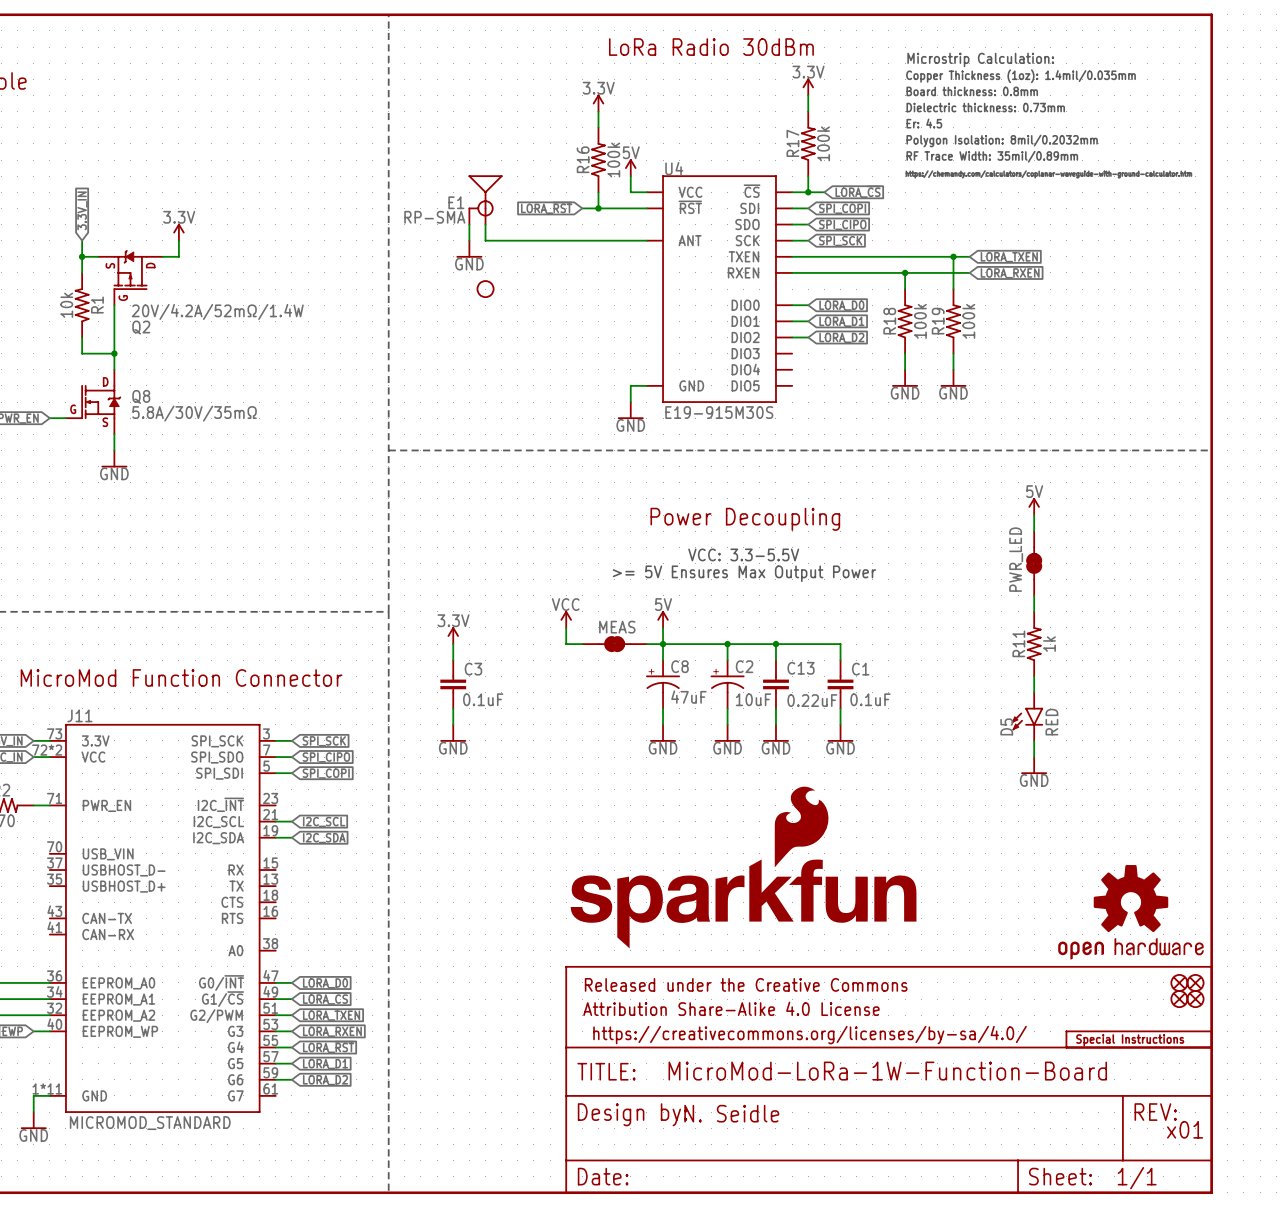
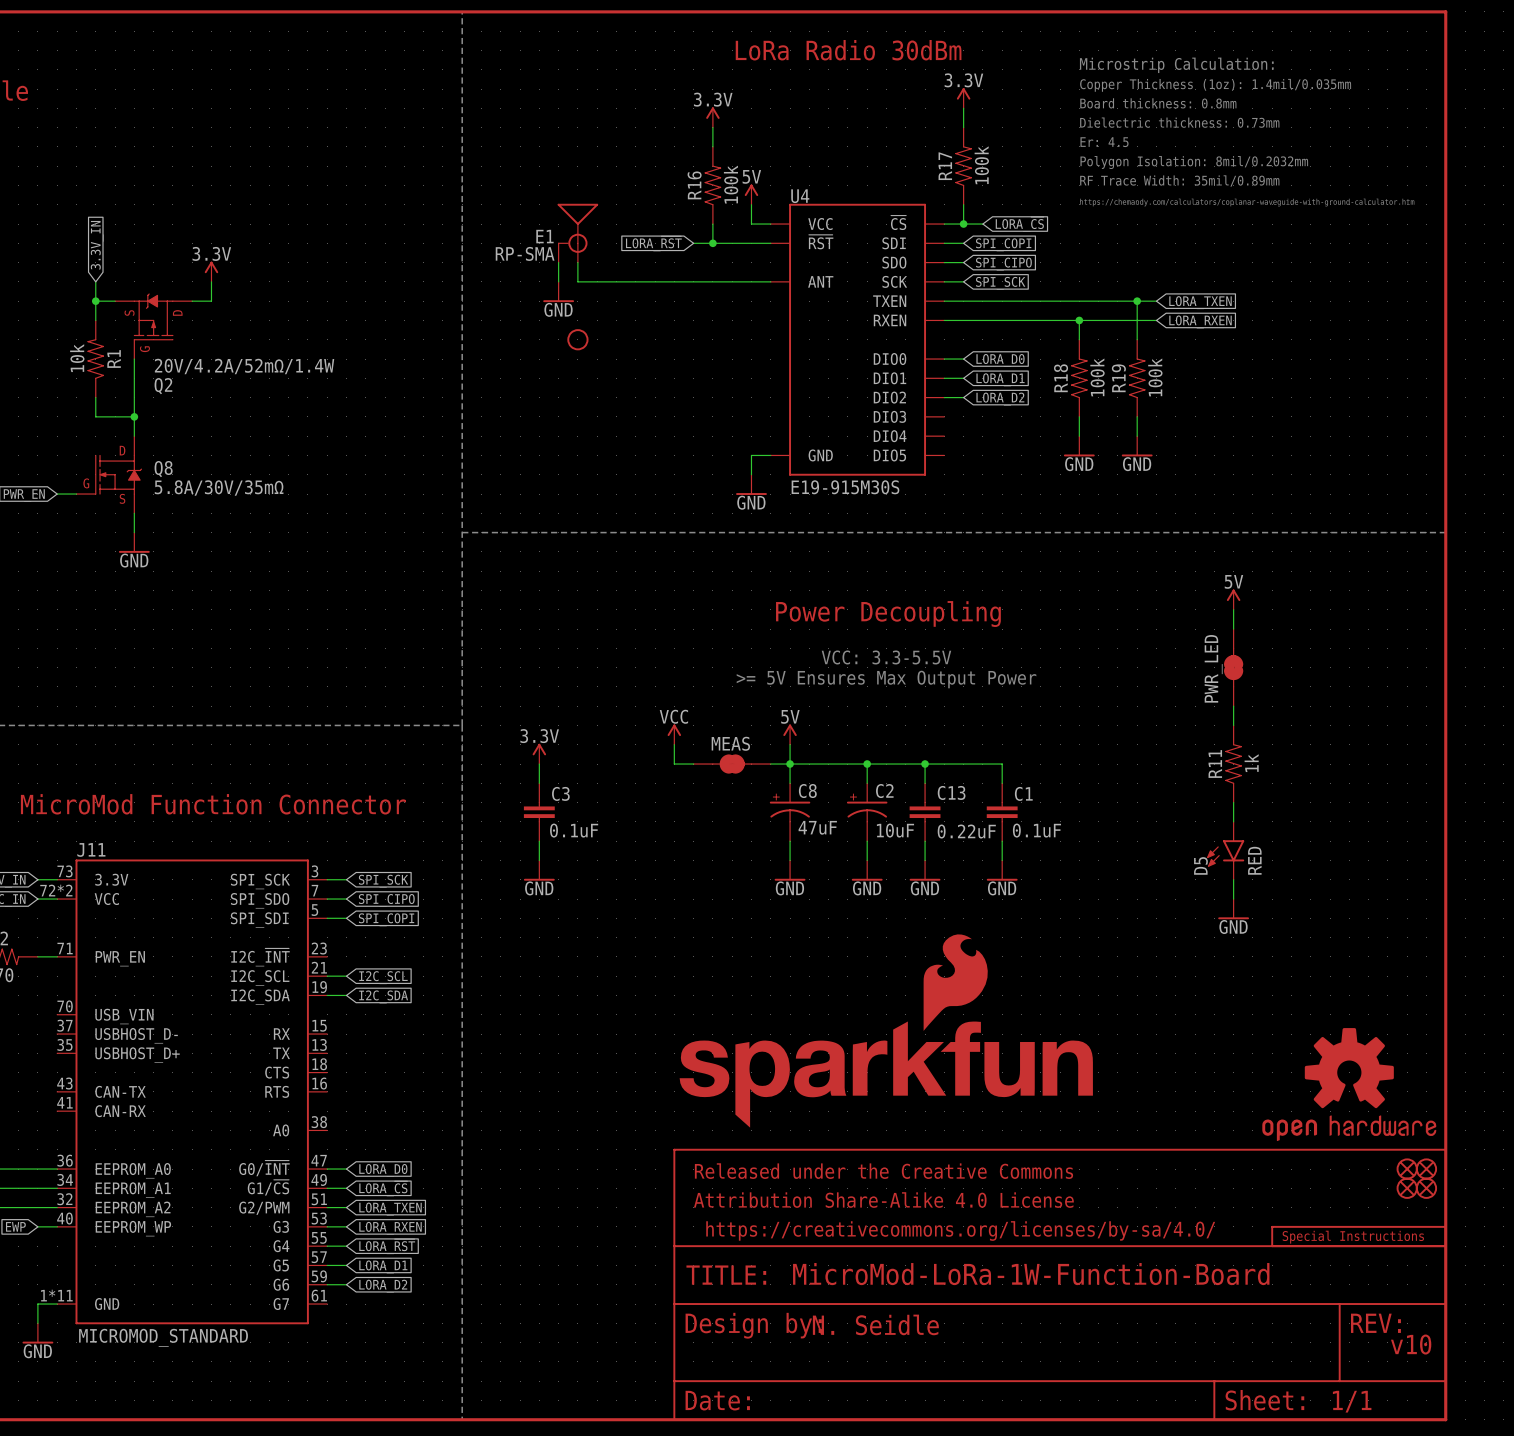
text: x01 (1185, 1129) -> v10 (1411, 1344)

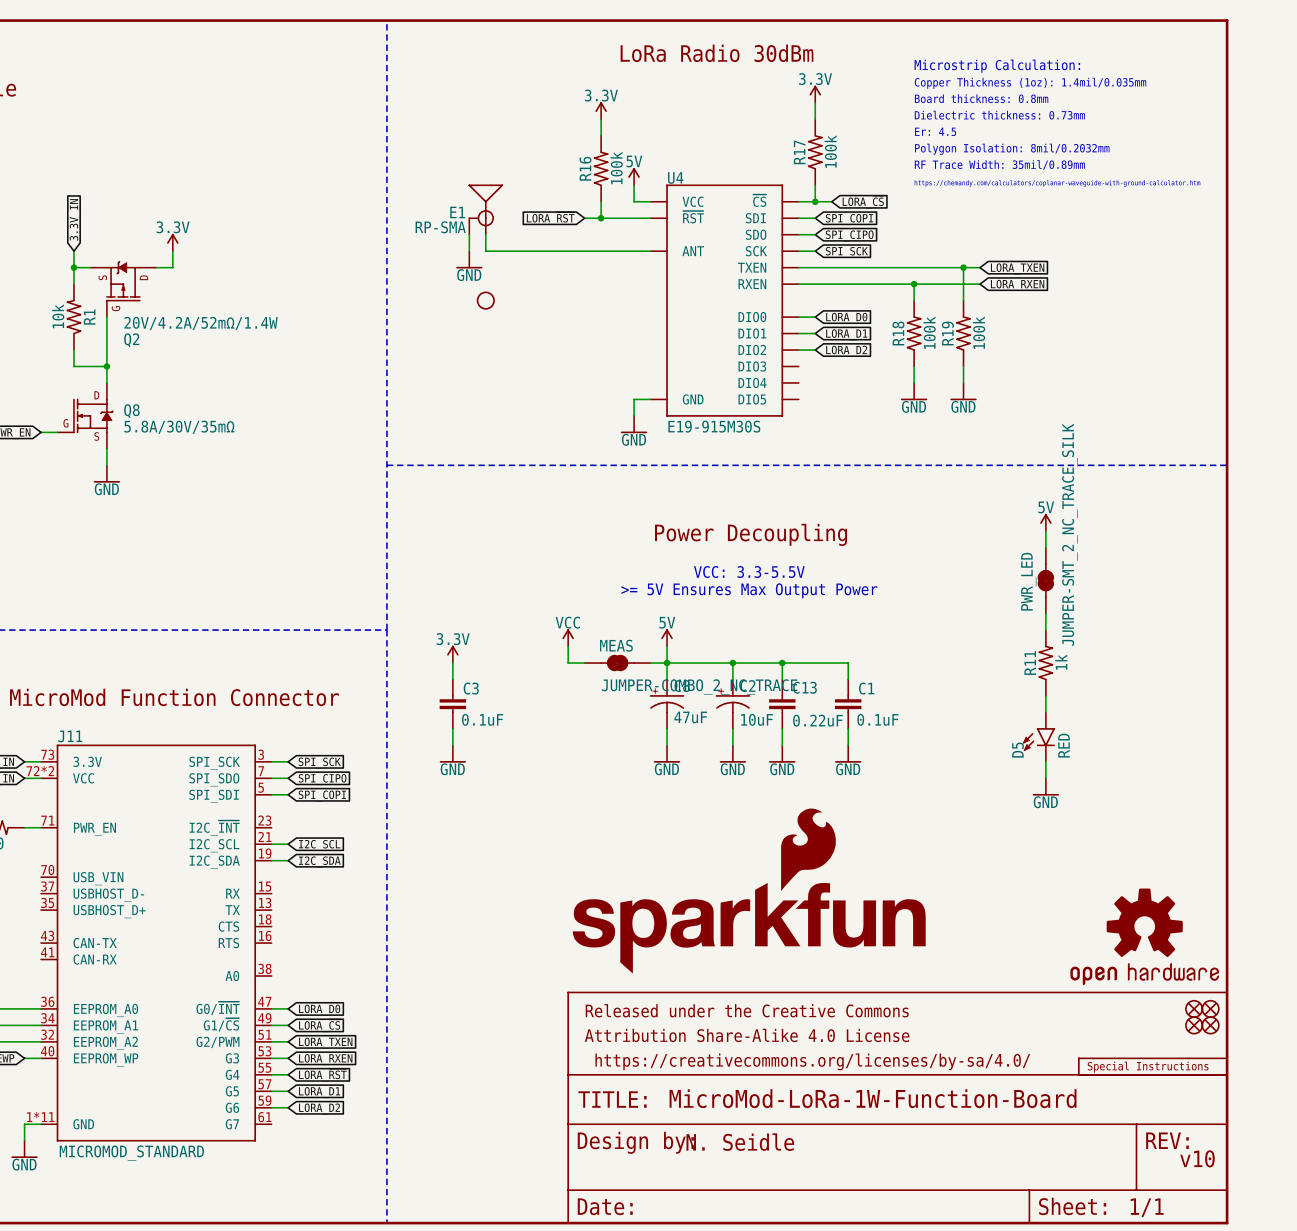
PWR_LED value: none -> JUMPER-SMT_2_NC_TRACE_SILK (1069, 534)
MEAS value: none -> JUMPER-COMBO_2_NC_TRACE (699, 687)

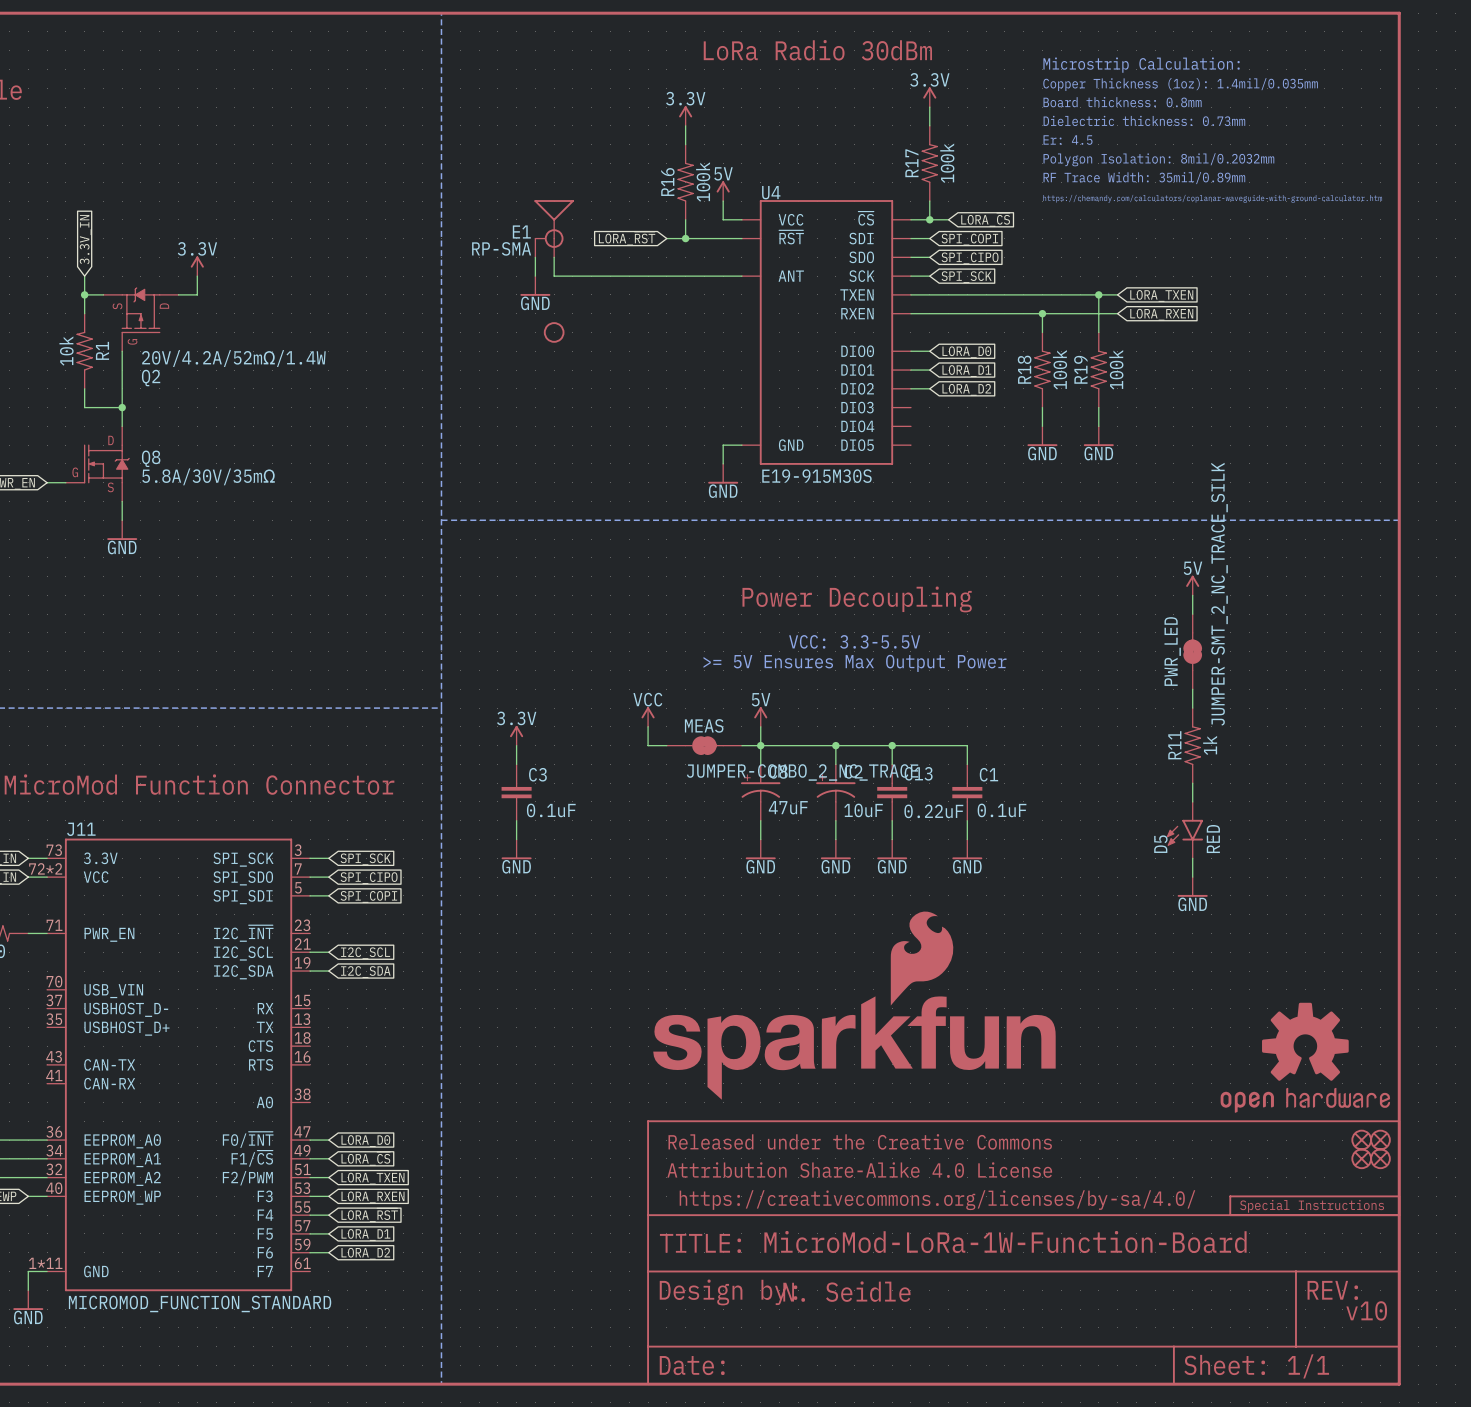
J11 pin name: G0/~{INT} (218, 1008) -> F0/~{INT} (248, 1139)
J11 pin name: G1/~{CS} (221, 1024) -> F1/~{CS} (252, 1158)
J11 pin name: G2/PWM (217, 1042) -> F2/PWM (247, 1178)
J11 pin name: G3 (232, 1058) -> F3 (265, 1196)
J11 pin name: G4 (232, 1074) -> F4 (265, 1215)
J11 pin name: G5 (232, 1091) -> F5 (265, 1234)
J11 pin name: G6 (232, 1107) -> F6 (265, 1252)
J11 pin name: G7 (232, 1124) -> F7 (265, 1271)
J11 value: MICROMOD_STANDARD (131, 1153) -> MICROMOD_FUNCTION_STANDARD (200, 1303)

